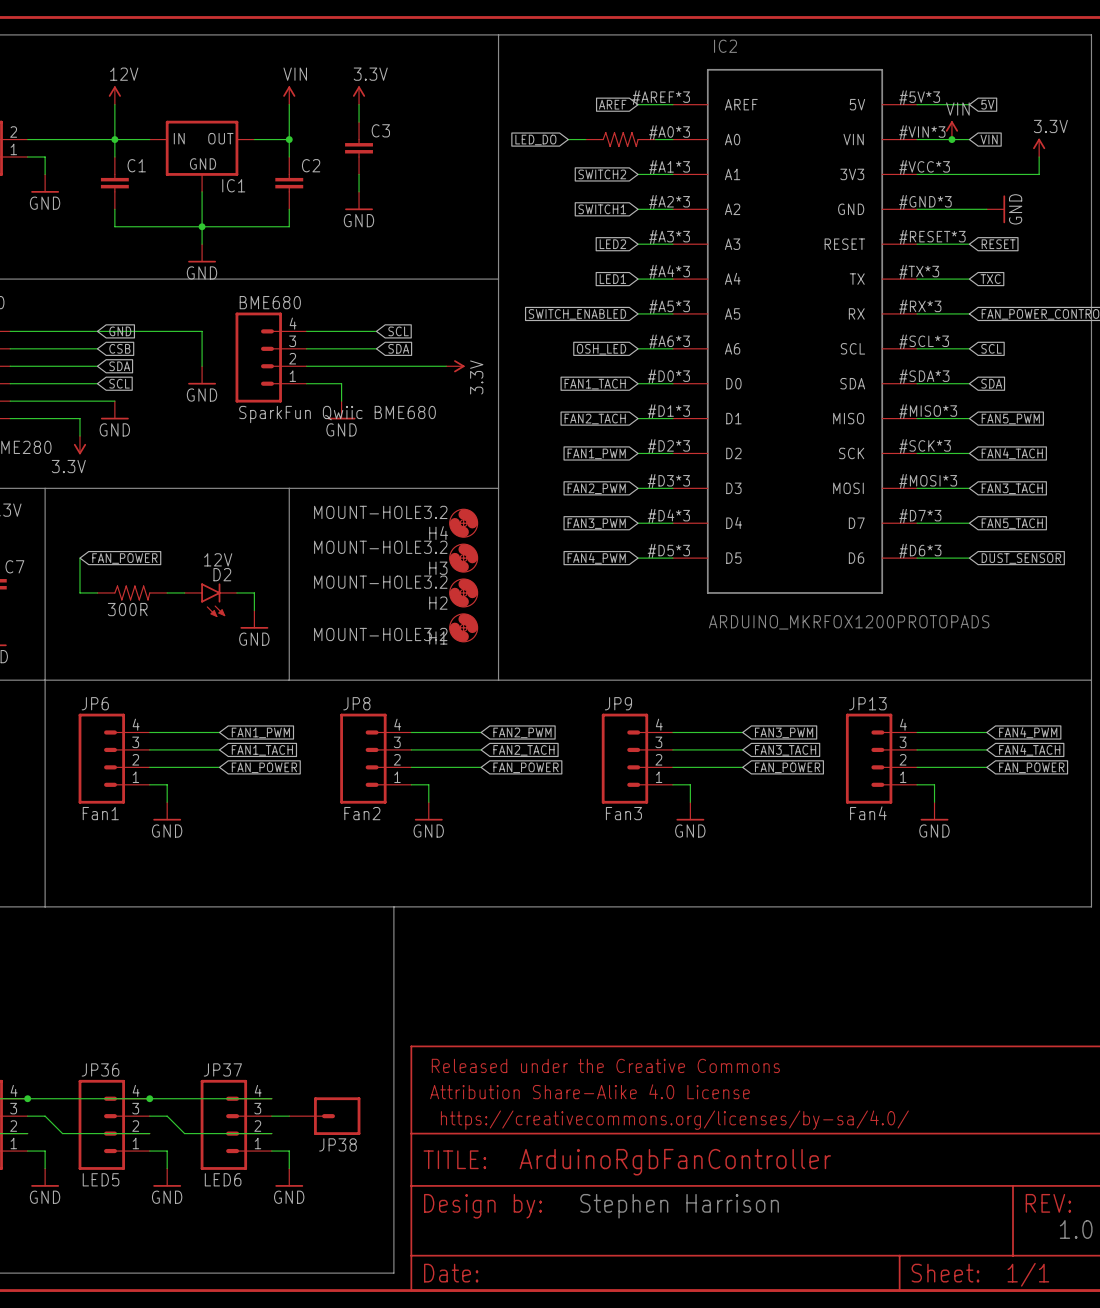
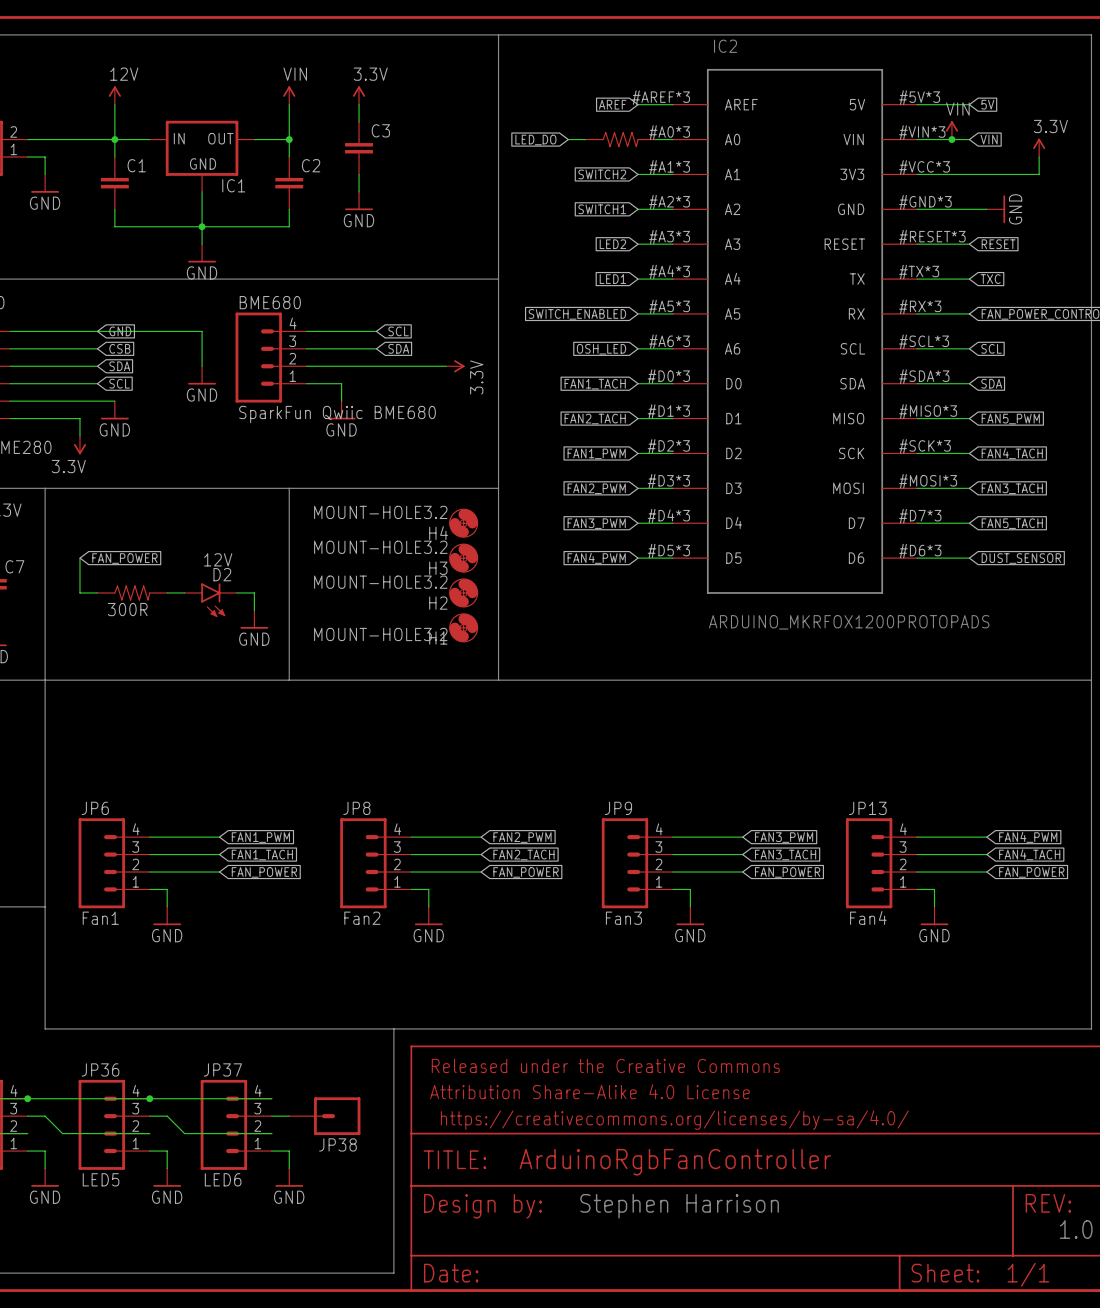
wire: (149, 732) (219, 732) -> (149, 837) (219, 837)
global label position: FAN1_PWM (260, 732) -> FAN1_PWM (260, 837)
wire: (411, 732) (481, 732) -> (411, 837) (481, 837)
global label position: FAN2_PWM (522, 732) -> FAN2_PWM (522, 837)
wire: (672, 732) (742, 732) -> (672, 837) (742, 837)
global label position: FAN3_PWM (784, 732) -> FAN3_PWM (784, 837)
wire: (917, 732) (986, 732) -> (917, 837) (986, 837)
global label position: FAN4_PWM (1028, 732) -> FAN4_PWM (1028, 837)
wire: (149, 749) (219, 749) -> (149, 854) (219, 854)
wire: (411, 749) (481, 749) -> (411, 854) (481, 854)
wire: (672, 749) (742, 749) -> (672, 854) (742, 854)
wire: (917, 749) (986, 749) -> (917, 854) (986, 854)
global label position: FAN1_TACH (262, 750) -> FAN1_TACH (262, 854)
global label position: FAN2_TACH (523, 750) -> FAN2_TACH (523, 854)
global label position: FAN3_TACH (785, 750) -> FAN3_TACH (785, 854)
global label position: FAN4_TACH (1029, 750) -> FAN4_TACH (1029, 854)
JP6 position: (114, 758) -> (114, 863)
JP8 position: (375, 758) -> (375, 863)
JP9 position: (637, 758) -> (637, 863)
JP13 position: (881, 758) -> (881, 863)
wire: (149, 767) (219, 767) -> (149, 872) (219, 872)
global label position: FAN_POWER (264, 767) -> FAN_POWER (264, 872)
wire: (411, 767) (481, 767) -> (411, 872) (481, 872)
global label position: FAN_POWER (526, 767) -> FAN_POWER (526, 872)
wire: (672, 767) (742, 767) -> (672, 872) (742, 872)
global label position: FAN_POWER (787, 767) -> FAN_POWER (787, 872)
wire: (917, 767) (986, 767) -> (917, 872) (986, 872)
global label position: FAN_POWER (1031, 767) -> FAN_POWER (1031, 872)
wire: (149, 784) (167, 784) (167, 802) -> (149, 889) (167, 889) (167, 906)
wire: (411, 784) (428, 784) (428, 802) -> (411, 889) (428, 889) (428, 906)
wire: (672, 784) (690, 784) (690, 802) -> (672, 889) (690, 889) (690, 906)
wire: (917, 784) (934, 784) (934, 802) -> (917, 889) (934, 889) (934, 906)
power symbol position: GND (167, 811) -> GND (167, 916)
power symbol position: GND (428, 811) -> GND (428, 916)
power symbol position: GND (690, 811) -> GND (690, 916)
power symbol position: GND (934, 811) -> GND (934, 916)
line: (45, 906) (1091, 906) -> (45, 906) (45, 1028) (1091, 1028) (1091, 906)
line: (393, 906) (393, 1028) -> none

